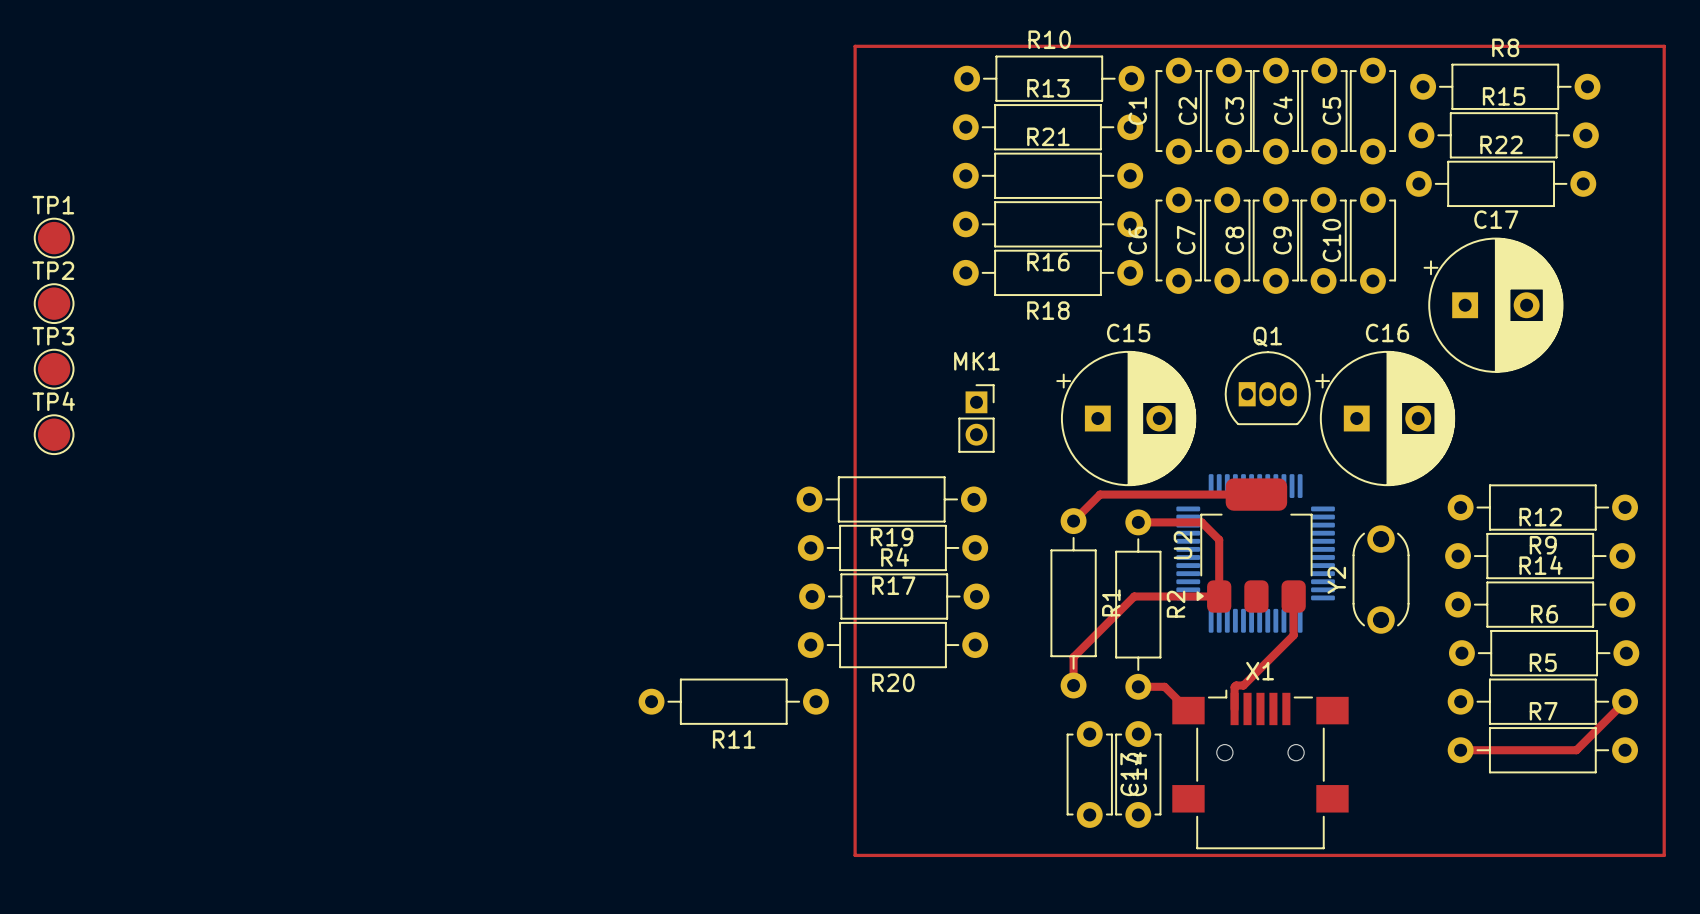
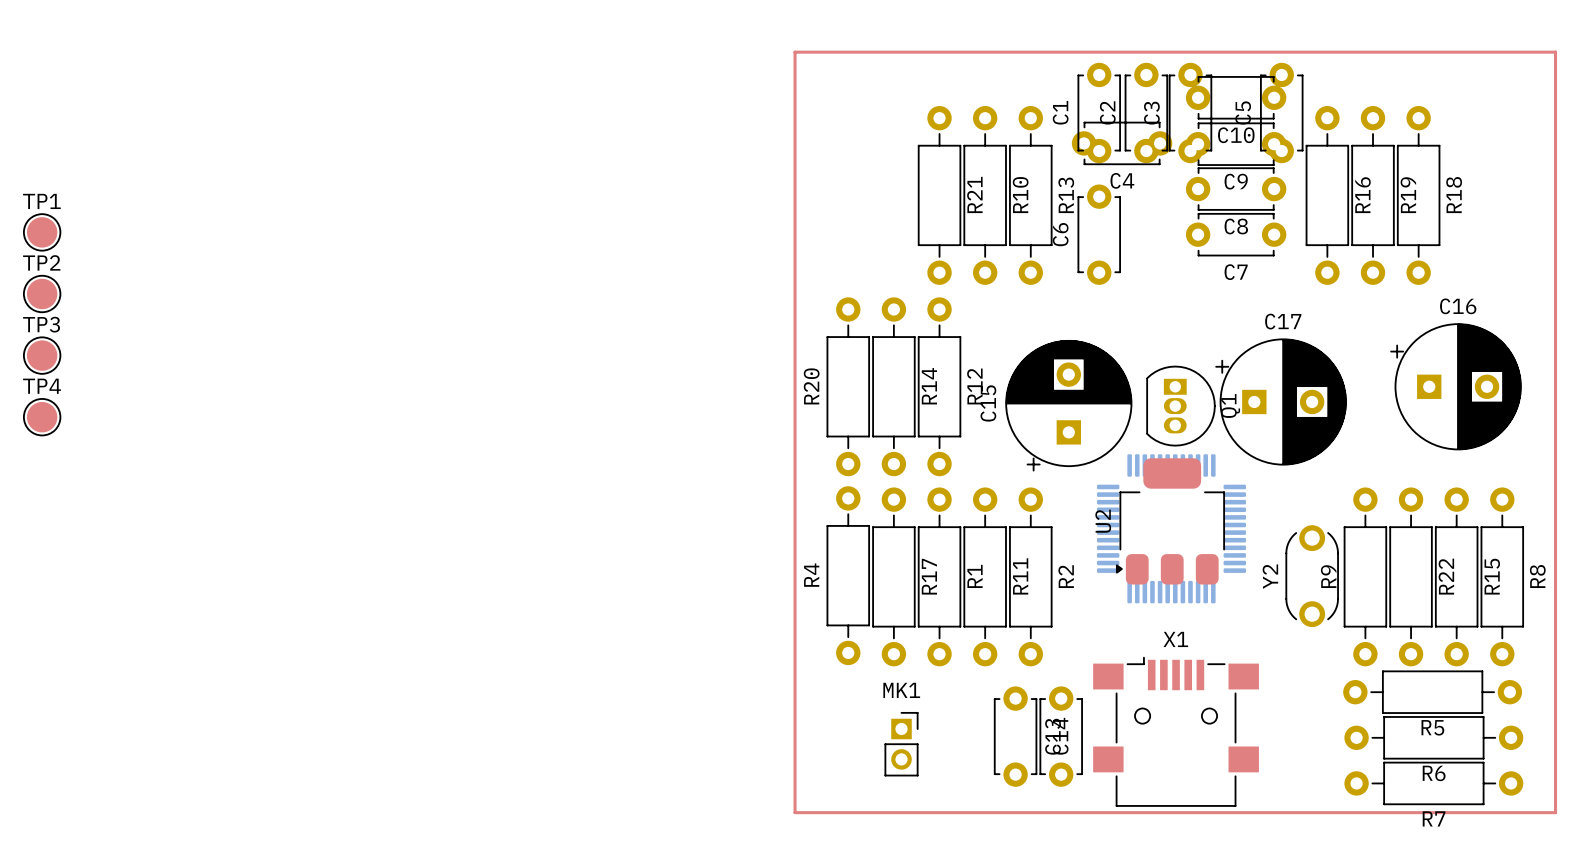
R10 rotation: 0° (1049, 78) -> 90° clockwise (985, 195)
R10 position: (1049, 78) -> (985, 195)
R8 rotation: 0° (1505, 86) -> 90° clockwise (1502, 576)
R8 position: (1505, 86) -> (1502, 576)
C4 name position: C4 (1282, 110) -> C4 (1122, 180)
C4 rotation: 0° (1324, 111) -> 90° clockwise (1122, 143)
C4 position: (1324, 111) -> (1122, 143)
R13 rotation: 0° (1048, 127) -> 90° clockwise (1030, 195)
R15 rotation: 0° (1503, 135) -> 90° clockwise (1456, 576)
R15 position: (1503, 135) -> (1456, 576)
R21 rotation: 0° (1048, 175) -> 90° clockwise (939, 195)
R22 rotation: 0° (1501, 183) -> 90° clockwise (1411, 576)
R22 position: (1501, 183) -> (1411, 576)
R16 rotation: 0° (1048, 224) -> 90° clockwise (1327, 195)
R16 position: (1048, 224) -> (1327, 195)
C7 name position: C7 (1186, 240) -> C7 (1236, 272)
C7 rotation: 0° (1227, 240) -> 90° clockwise (1236, 234)
C7 position: (1227, 240) -> (1236, 234)
C8 name position: C8 (1234, 240) -> C8 (1236, 226)
C8 rotation: 0° (1275, 240) -> 90° clockwise (1236, 189)
C8 position: (1275, 240) -> (1236, 189)
C9 name position: C9 (1282, 240) -> C9 (1236, 181)
C9 rotation: 0° (1323, 240) -> 90° clockwise (1236, 144)
C9 position: (1323, 240) -> (1236, 144)
C10 name position: C10 (1331, 240) -> C10 (1236, 135)
C10 rotation: 0° (1372, 240) -> 90° clockwise (1236, 97)
C10 position: (1372, 240) -> (1236, 97)
R16 name position: R16 (1048, 262) -> R16 (1362, 195)
R18 rotation: 0° (1048, 272) -> 90° clockwise (1418, 195)
R18 position: (1048, 272) -> (1418, 195)
C17 position: (1493, 305) -> (1281, 401)
R18 name position: R18 (1048, 310) -> R18 (1454, 195)
Q1 rotation: 0° (1267, 388) -> 90° clockwise (1180, 406)
MK1 position: (976, 418) -> (901, 744)
C15 rotation: 0° (1126, 418) -> 90° counterclockwise (1068, 405)
C16 position: (1385, 418) -> (1455, 386)
top track: (1256, 494) (1100, 494) (1073, 521) -> none
R19 rotation: 0° (891, 499) -> 90° clockwise (1373, 195)
R19 position: (891, 499) -> (1373, 195)
R9 rotation: 0° (1542, 507) -> 90° clockwise (1365, 576)
R9 position: (1542, 507) -> (1365, 576)
top track: (1138, 522) (1201, 522) (1219, 539) (1219, 596) (1134, 596) (1073, 657) (1073, 685) -> none
R19 name position: R19 (892, 537) -> R19 (1408, 195)
R17 rotation: 0° (892, 547) -> 90° clockwise (893, 576)
R12 rotation: 0° (1540, 556) -> 90° clockwise (939, 386)
R12 position: (1540, 556) -> (939, 386)
R4 name position: R4 (895, 557) -> R4 (811, 575)
Y2 position: (1381, 579) -> (1312, 576)
R17 name position: R17 (893, 585) -> R17 (929, 576)
R4 rotation: 0° (894, 596) -> 90° clockwise (848, 575)
top track: (1293, 596) (1293, 635) (1243, 685) (1234, 687) (1234, 708) -> none
R1 position: (1073, 603) -> (939, 576)
R2 position: (1138, 604) -> (1030, 576)
R14 rotation: 0° (1540, 604) -> 90° clockwise (893, 386)
R14 position: (1540, 604) -> (893, 386)
R6 name position: R6 (1544, 614) -> R6 (1434, 773)
R20 rotation: 0° (892, 645) -> 90° clockwise (848, 386)
R20 position: (892, 645) -> (848, 386)
R6 position: (1544, 653) -> (1433, 737)
R5 name position: R5 (1543, 662) -> R5 (1432, 727)
top track: (1138, 686) (1164, 686) (1188, 710) -> none
R11 rotation: 0° (733, 701) -> 90° clockwise (985, 576)
R11 position: (733, 701) -> (985, 576)
R5 position: (1542, 701) -> (1432, 692)
top track: (1625, 701) (1576, 750) (1460, 750) -> none
R7 name position: R7 (1543, 711) -> R7 (1434, 818)
R11 name position: R11 (734, 739) -> R11 (1020, 576)
R7 position: (1542, 750) -> (1433, 783)

